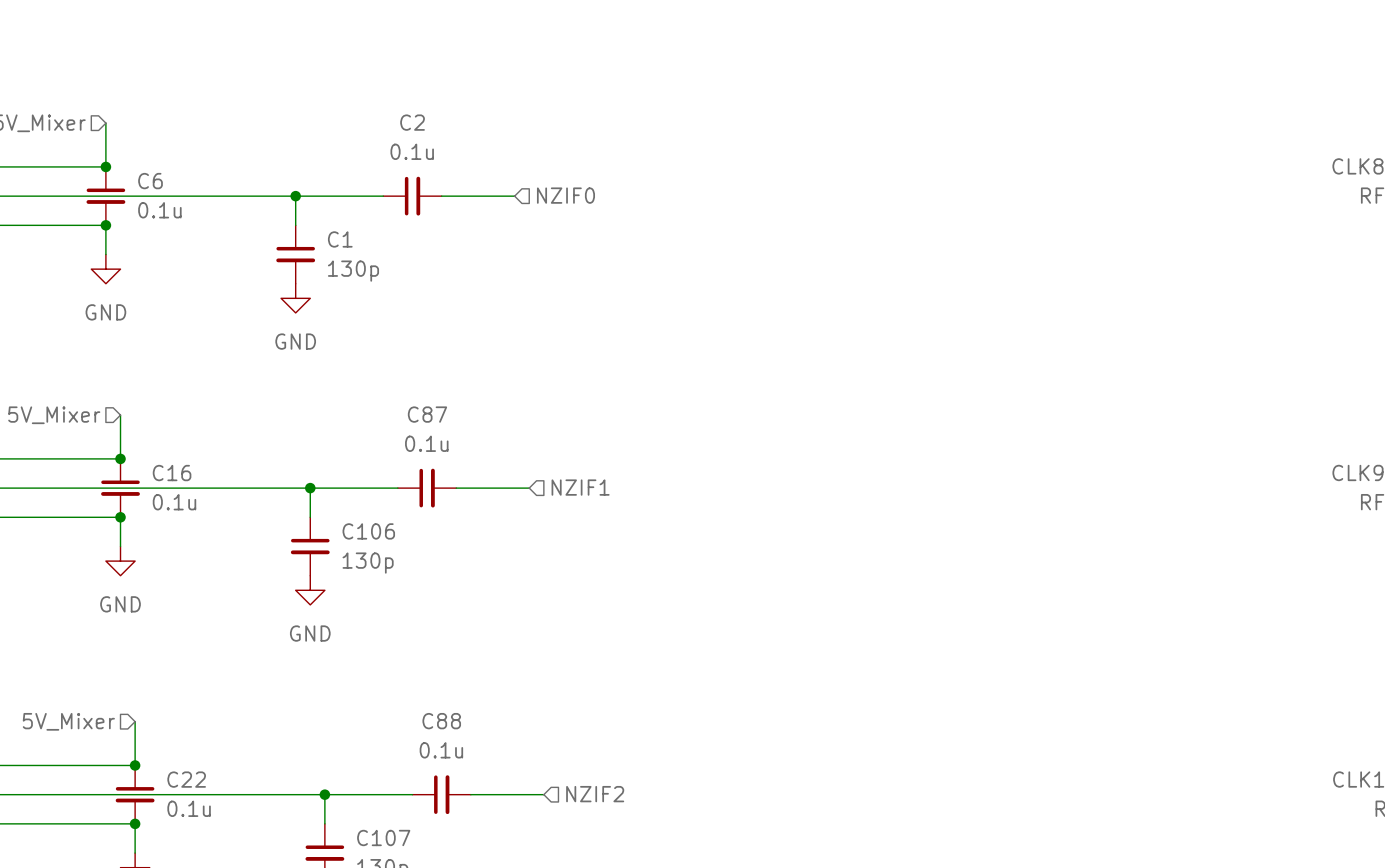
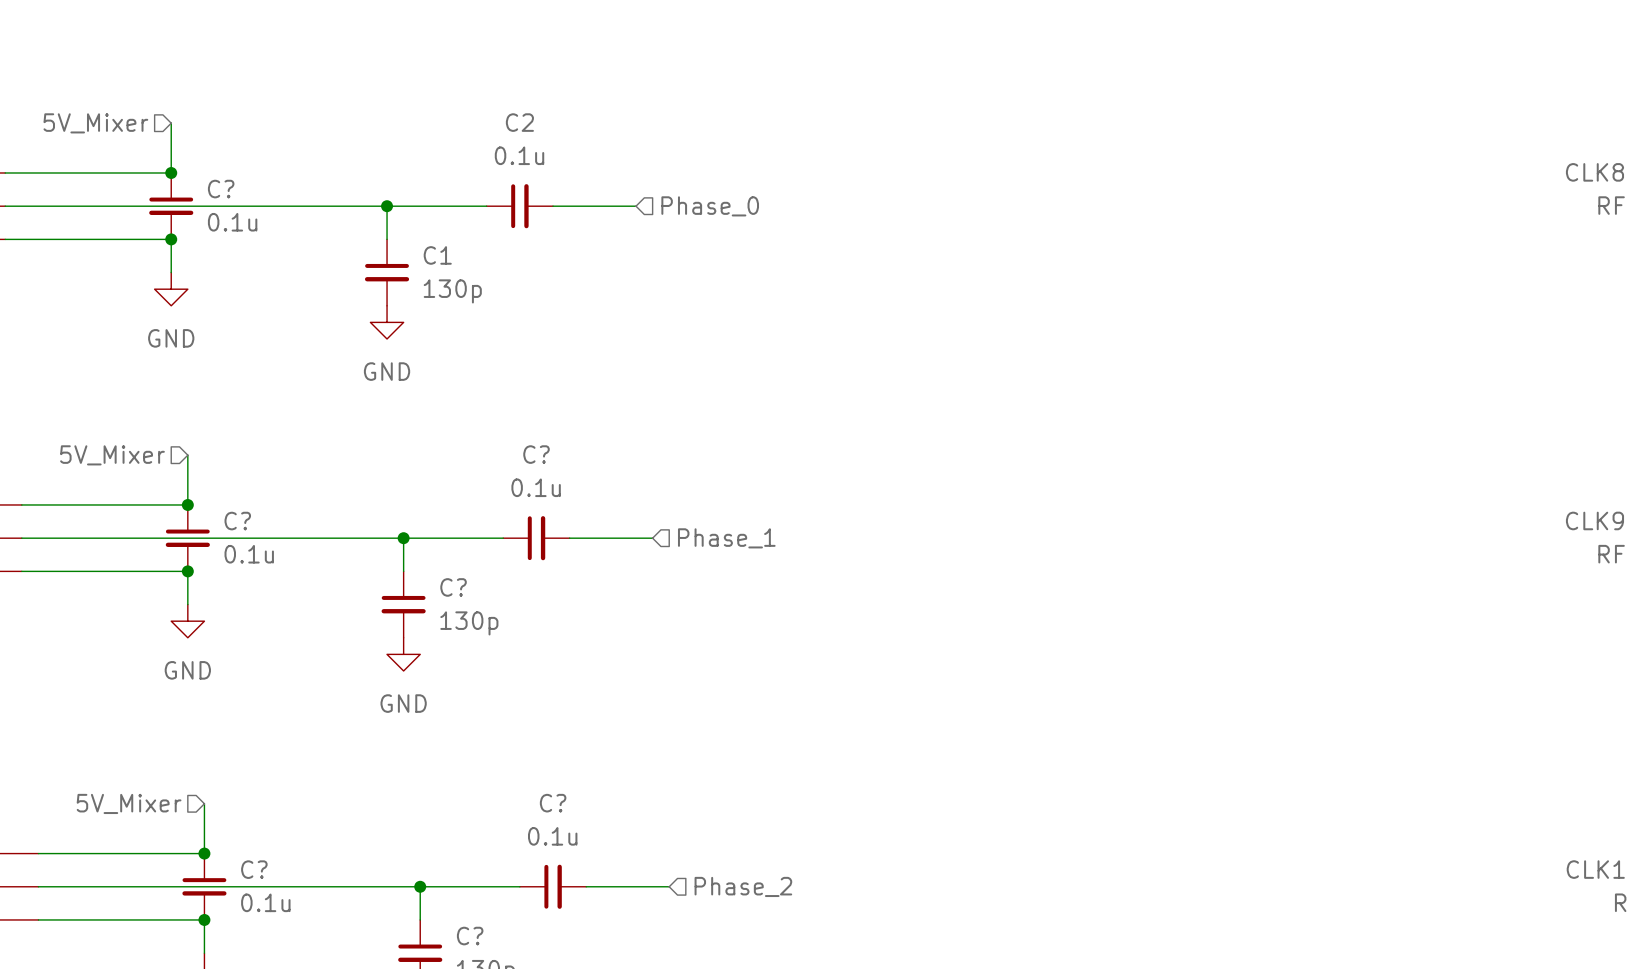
C6 name: C6 (150, 181) -> C? (221, 189)
hierarchical label: NZIF0 (565, 195) -> Phase_0 (710, 206)
C87 name: C87 (427, 414) -> C? (536, 454)
C16 name: C16 (172, 473) -> C? (237, 521)
hierarchical label: NZIF1 (580, 487) -> Phase_1 (726, 538)
C106 name: C106 (368, 531) -> C? (453, 587)
C88 name: C88 (441, 721) -> C? (553, 803)
C22 name: C22 (186, 779) -> C? (254, 869)
hierarchical label: NZIF2 (595, 794) -> Phase_2 (743, 886)
C107 name: C107 (383, 837) -> C? (470, 936)

